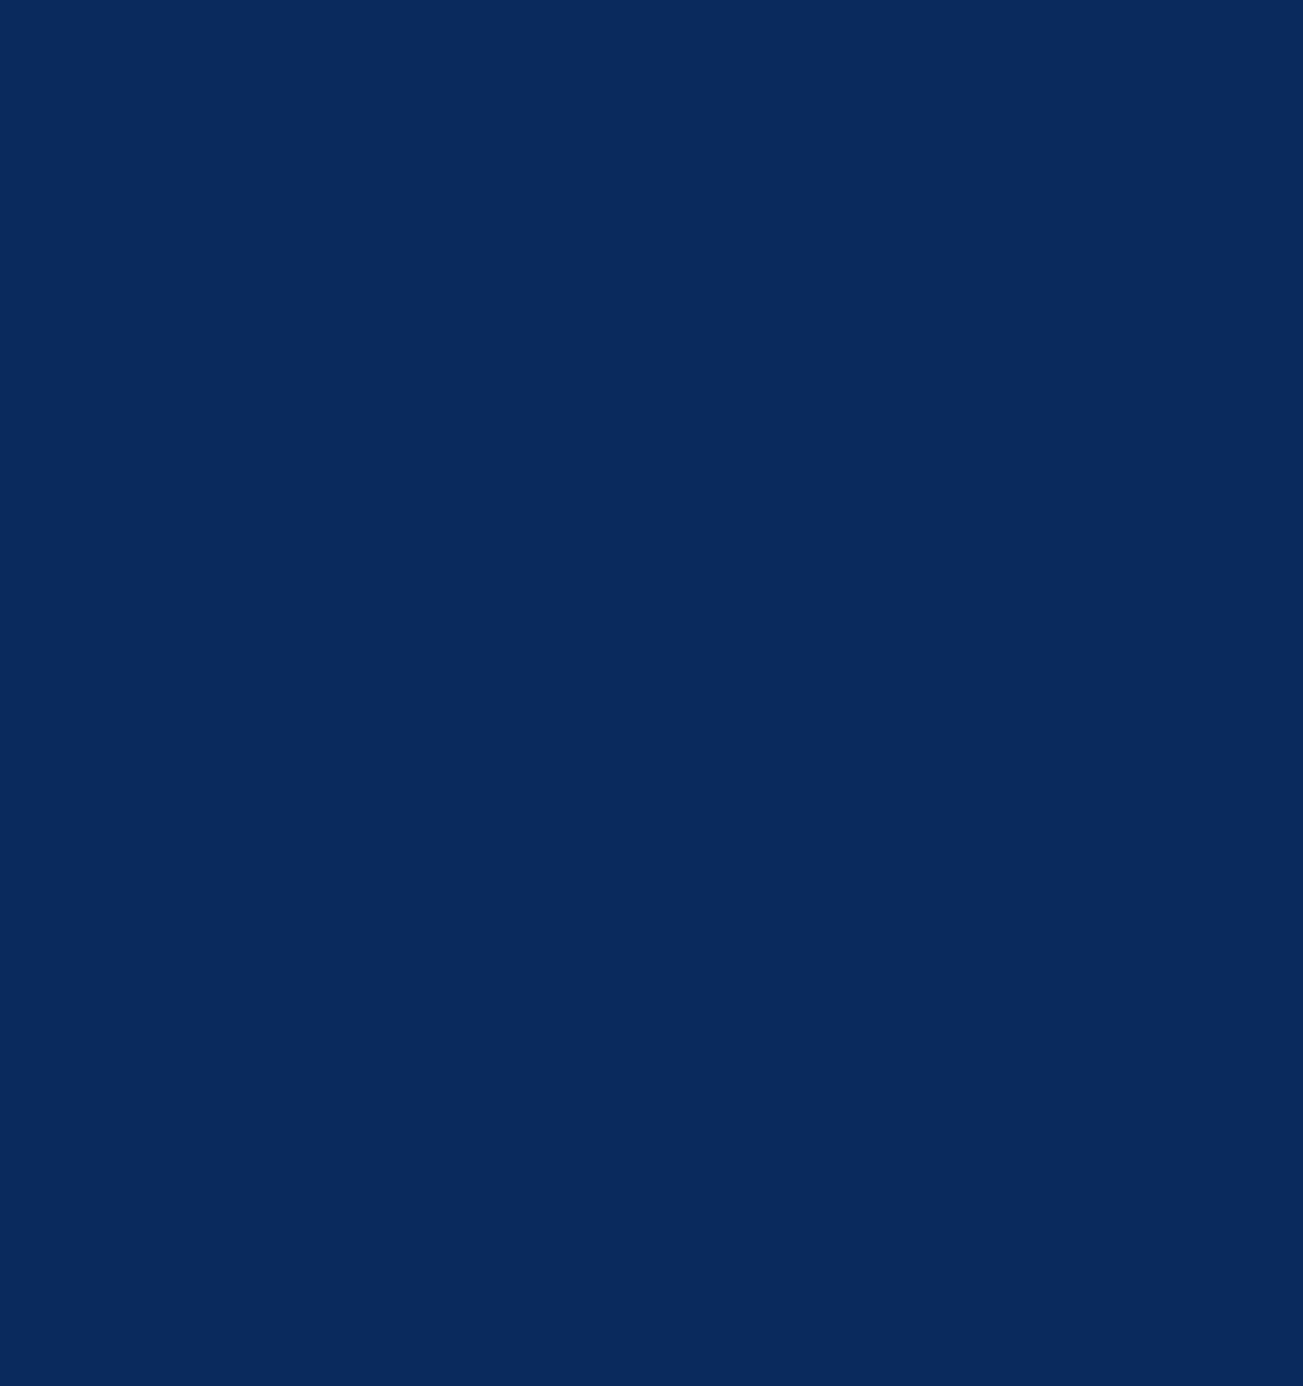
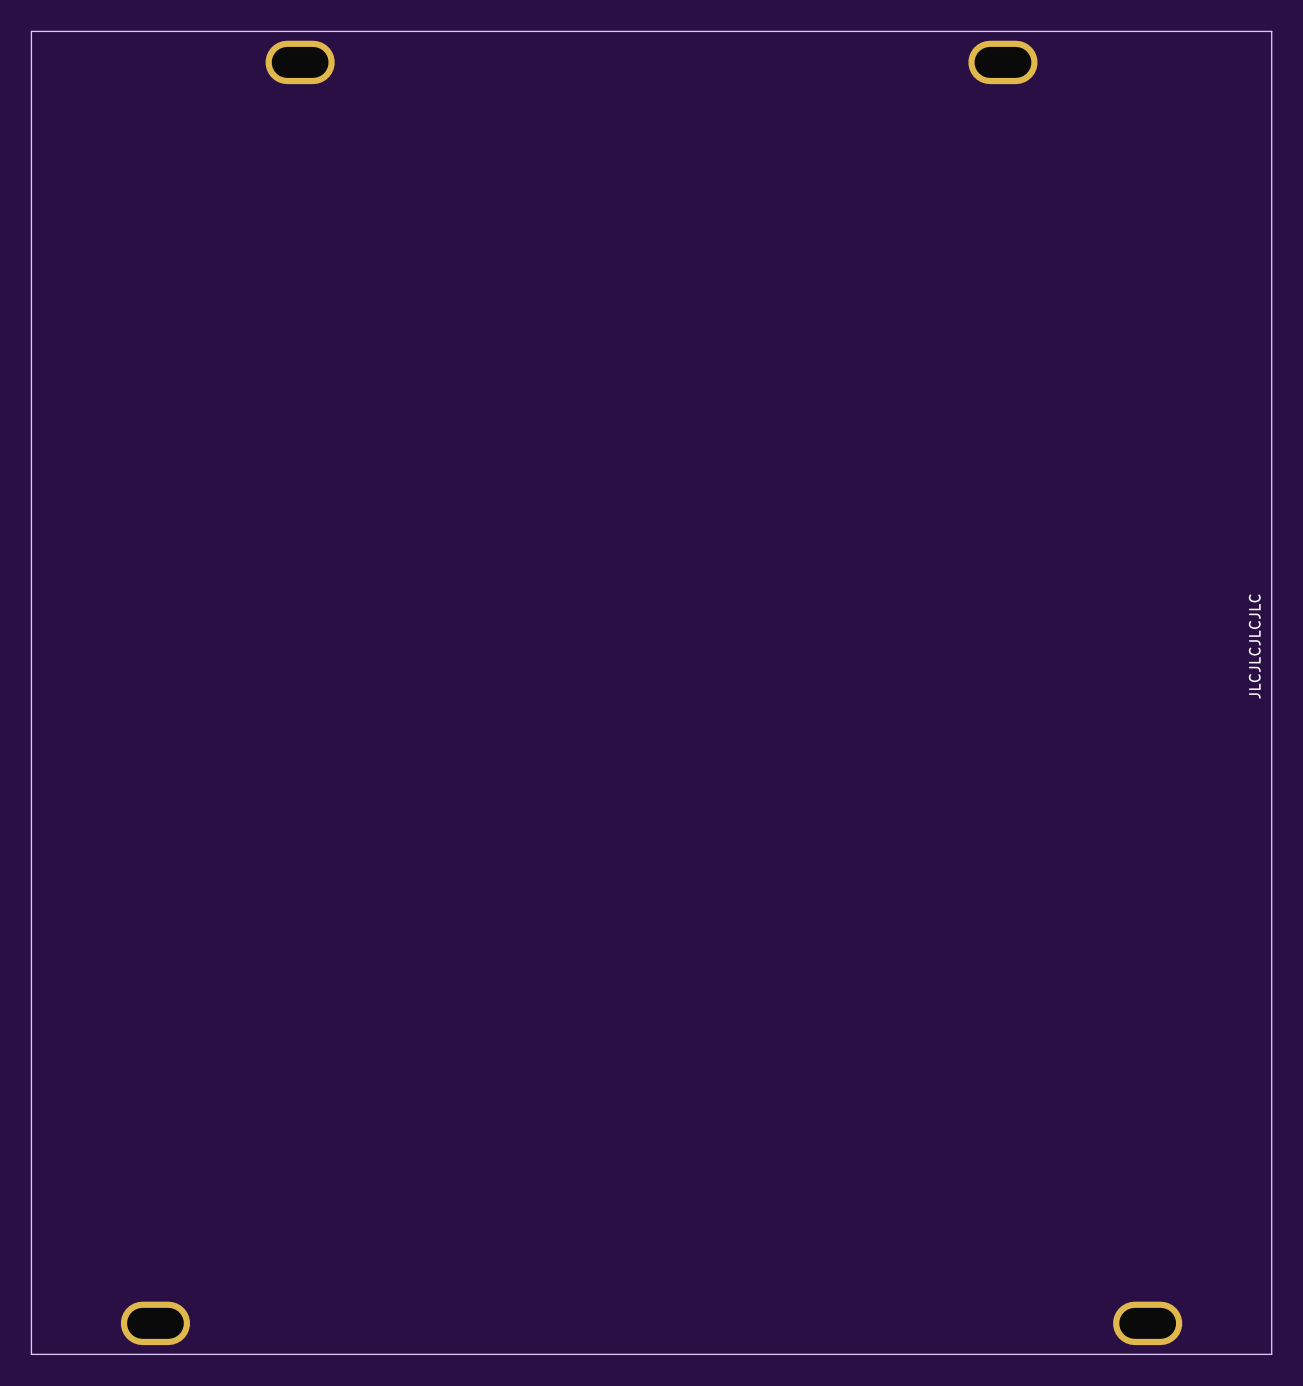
board edge: none -> (1271, 31) (1271, 1354) (31, 1354) (31, 31) (1271, 31)
part: none -> (300, 62)
part: none -> (1002, 62)
text: none -> JLCJLCJLCJLC (1254, 646)
part: none -> (155, 1323)
part: none -> (1147, 1323)

